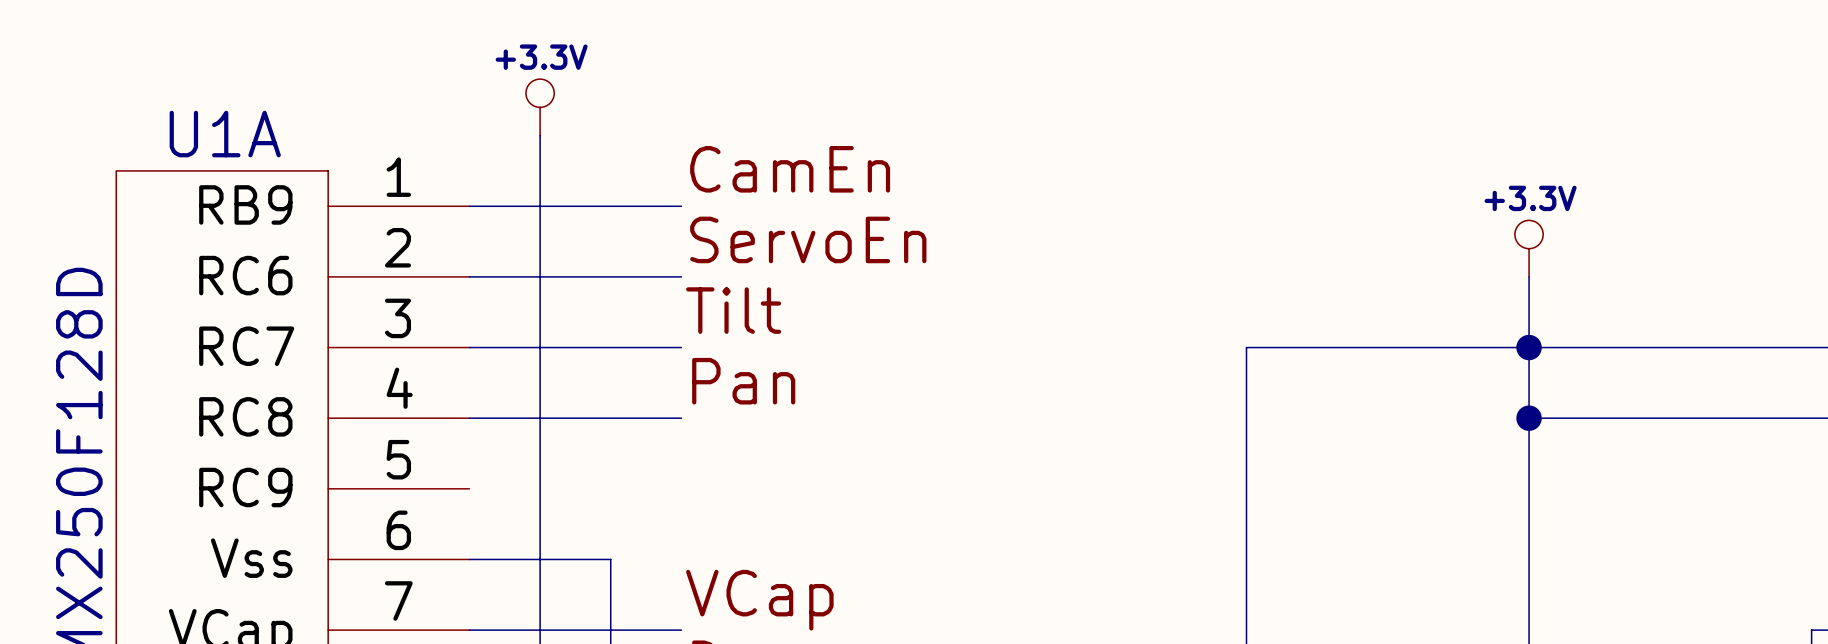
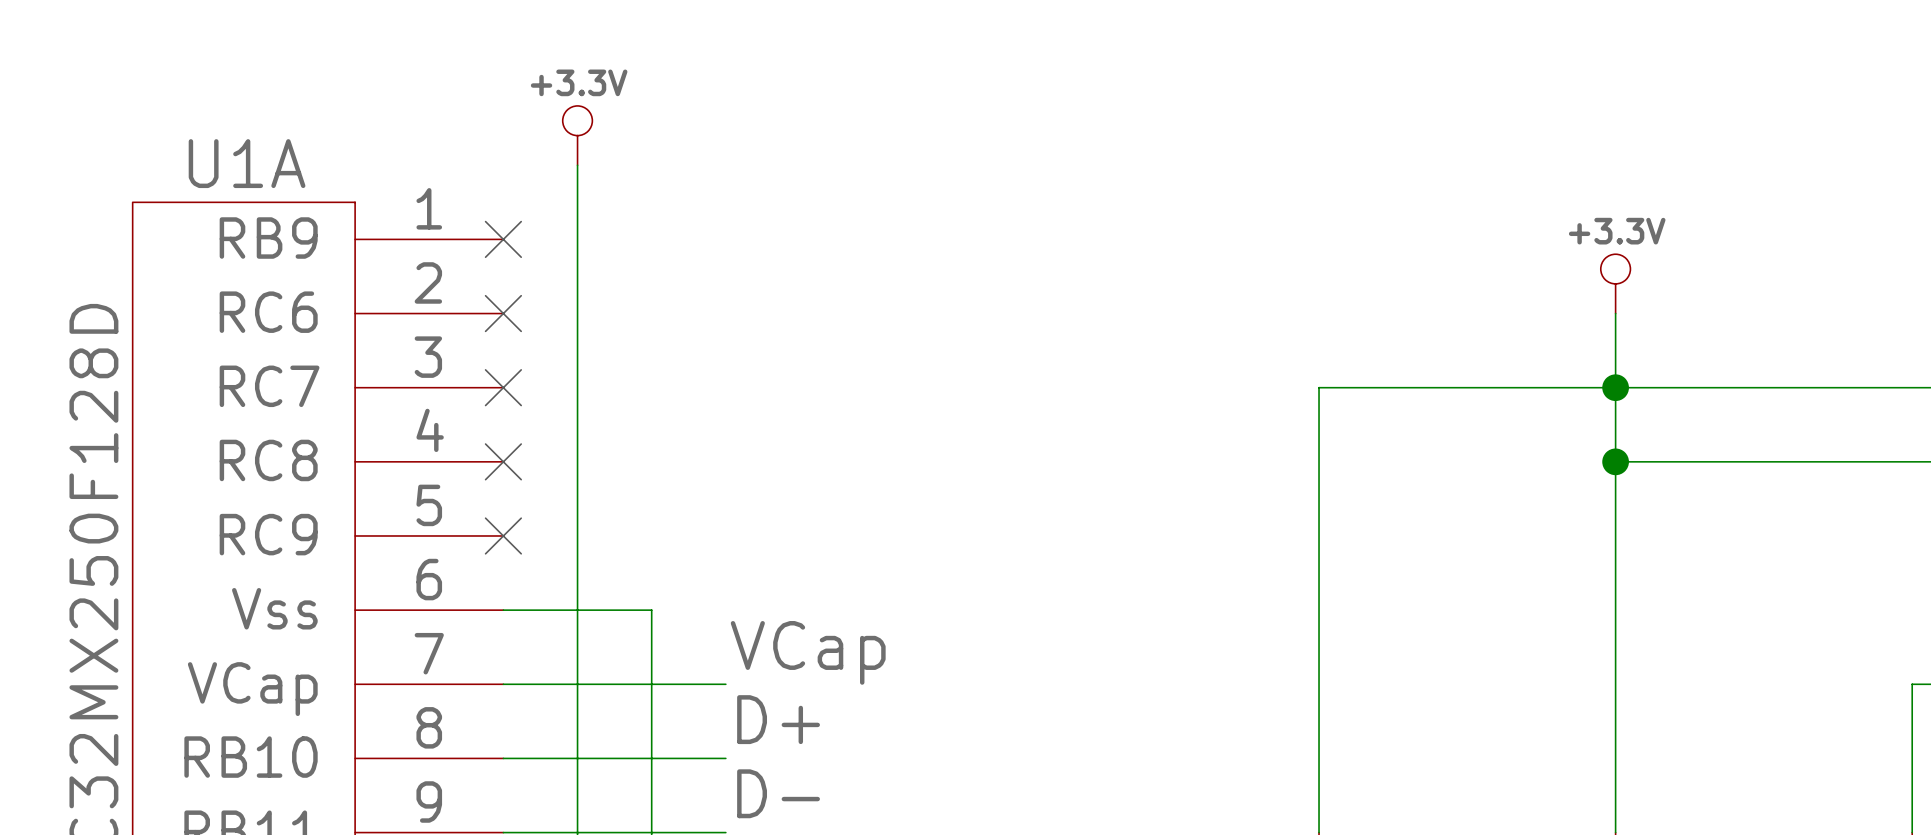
label: CamEn (790, 169) -> none
wire: (469, 206) (681, 206) -> none
no-connect mark: none -> (503, 239)
label: ServoEn (808, 239) -> none
wire: (469, 276) (681, 276) -> none
no-connect mark: none -> (503, 313)
label: Tilt (733, 310) -> none
wire: (469, 347) (681, 347) -> none
no-connect mark: none -> (503, 387)
label: Pan (743, 381) -> none
wire: (469, 418) (681, 418) -> none
no-connect mark: none -> (503, 461)
no-connect mark: none -> (503, 535)

